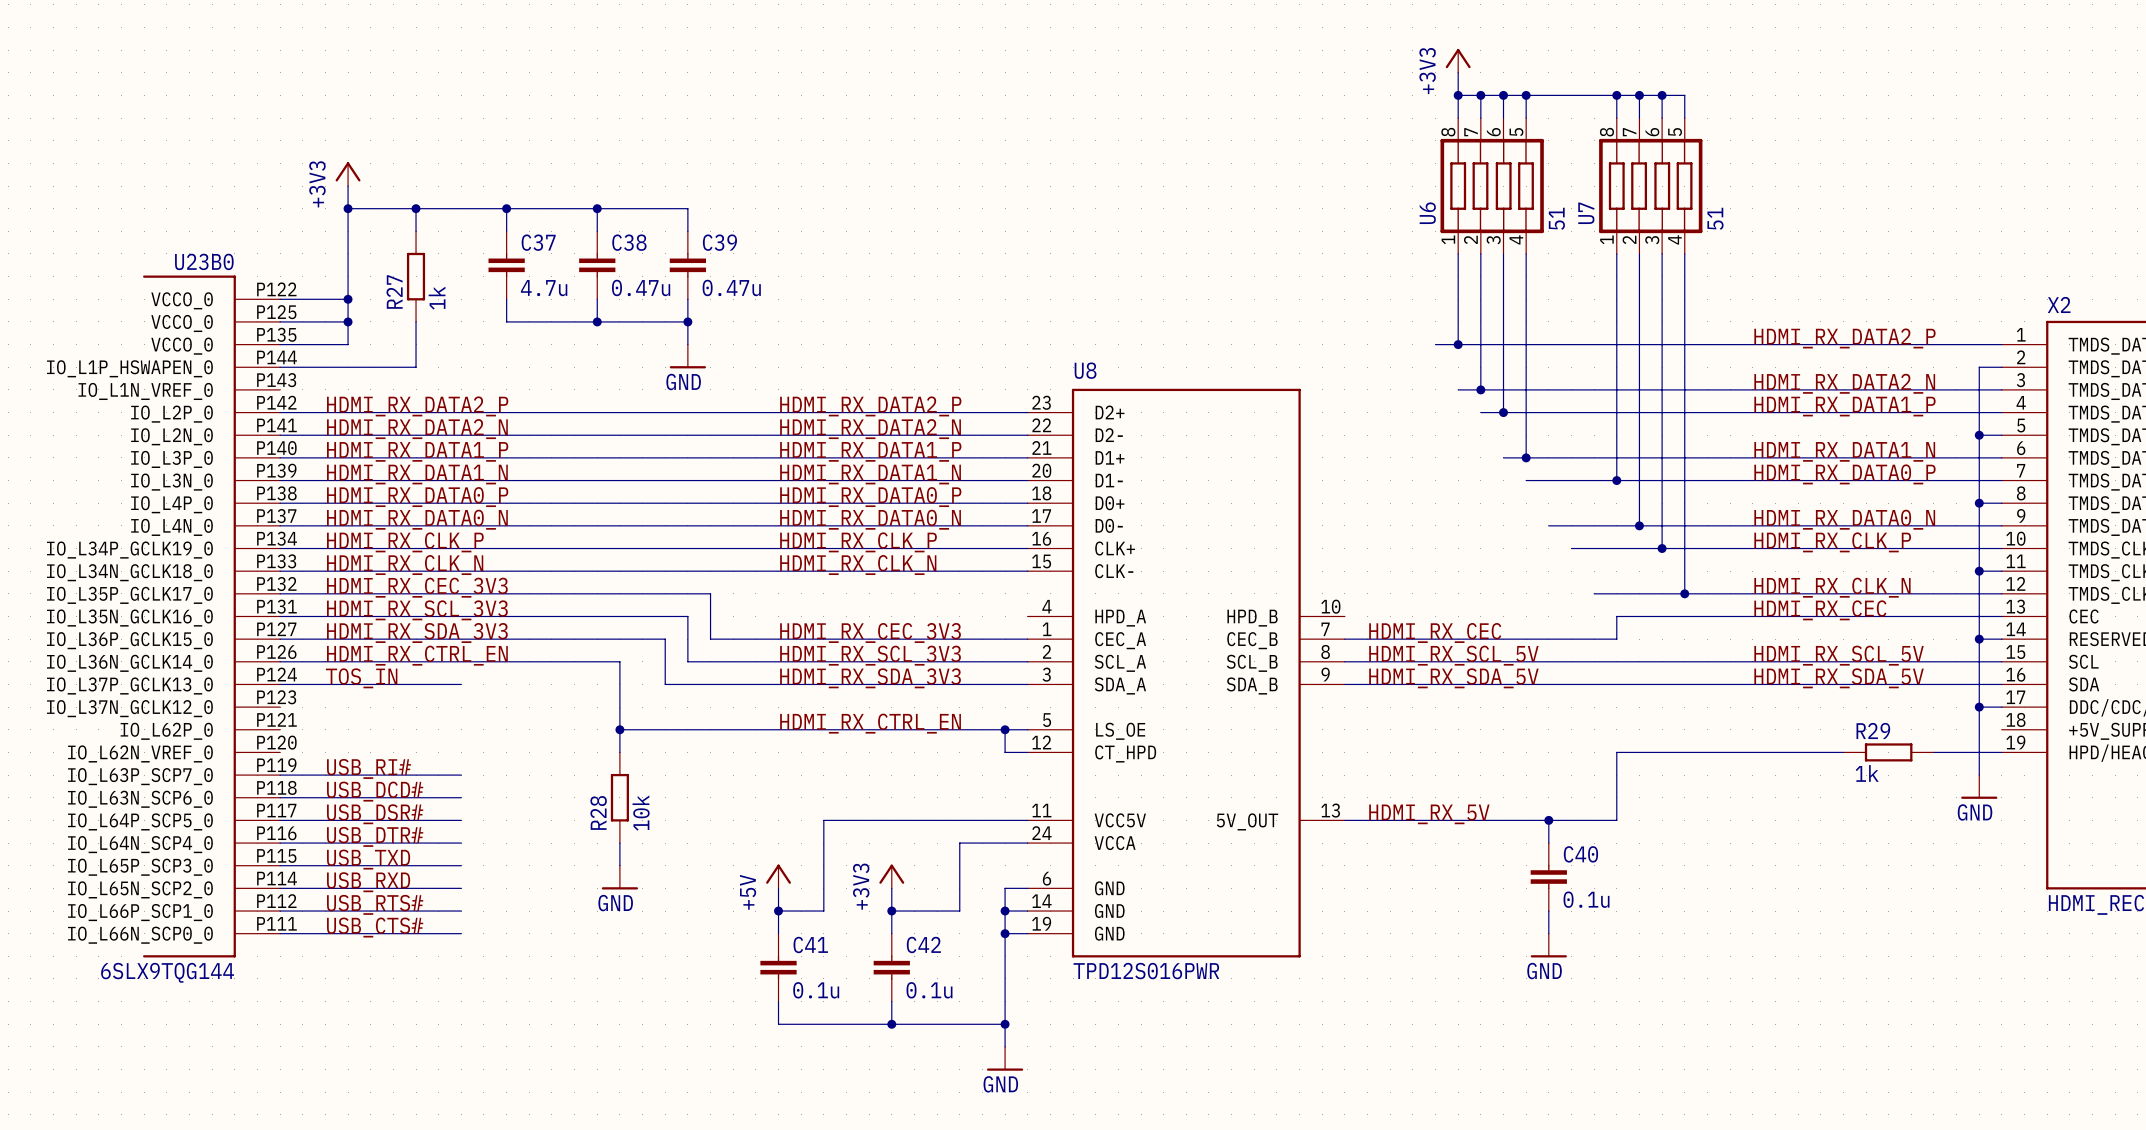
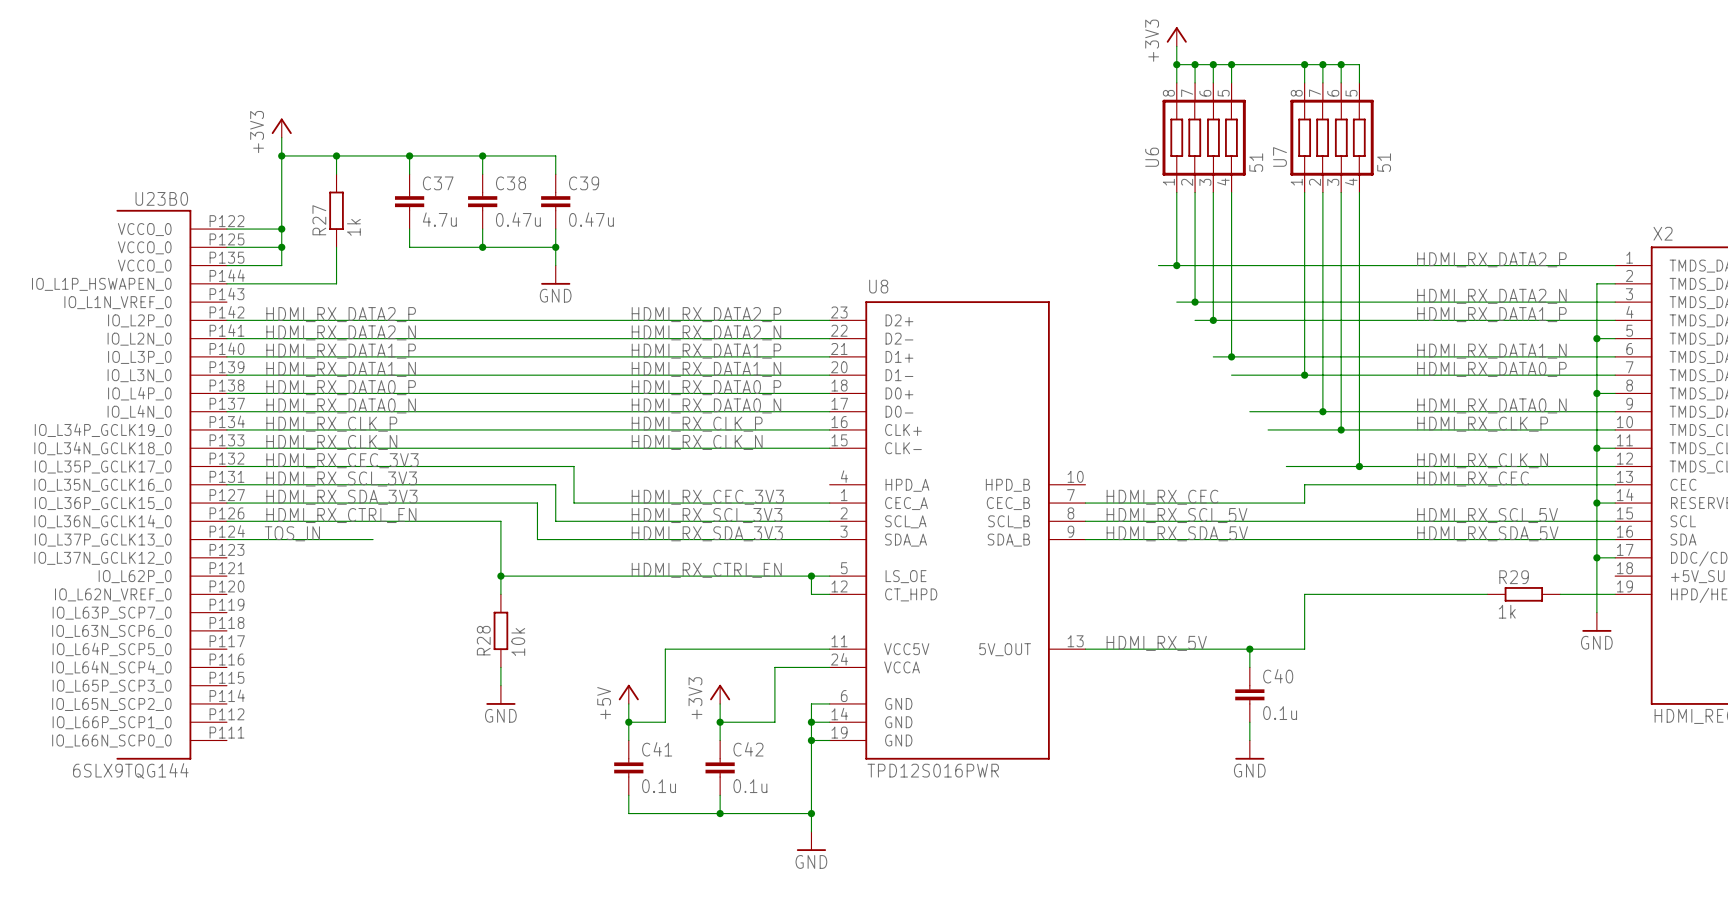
label: USB_RI# (368, 768) -> none
wire: (280, 775) (461, 775) -> none
label: USB_DCD# (375, 791) -> none
wire: (280, 797) (461, 797) -> none
label: USB_DSR# (375, 814) -> none
wire: (280, 820) (461, 820) -> none
label: USB_DTR# (375, 836) -> none
wire: (280, 843) (461, 843) -> none
label: USB_TXD (368, 859) -> none
wire: (280, 865) (461, 865) -> none
label: USB_RXD (368, 882) -> none
wire: (280, 888) (461, 888) -> none
label: USB_RTS# (375, 904) -> none
wire: (280, 911) (461, 911) -> none
label: USB_CTS# (375, 927) -> none
wire: (280, 933) (461, 933) -> none

